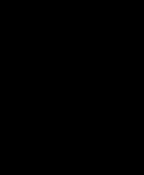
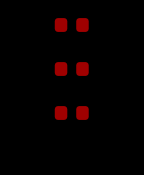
part: none -> (71, 25)
part: none -> (71, 69)
part: none -> (71, 113)

